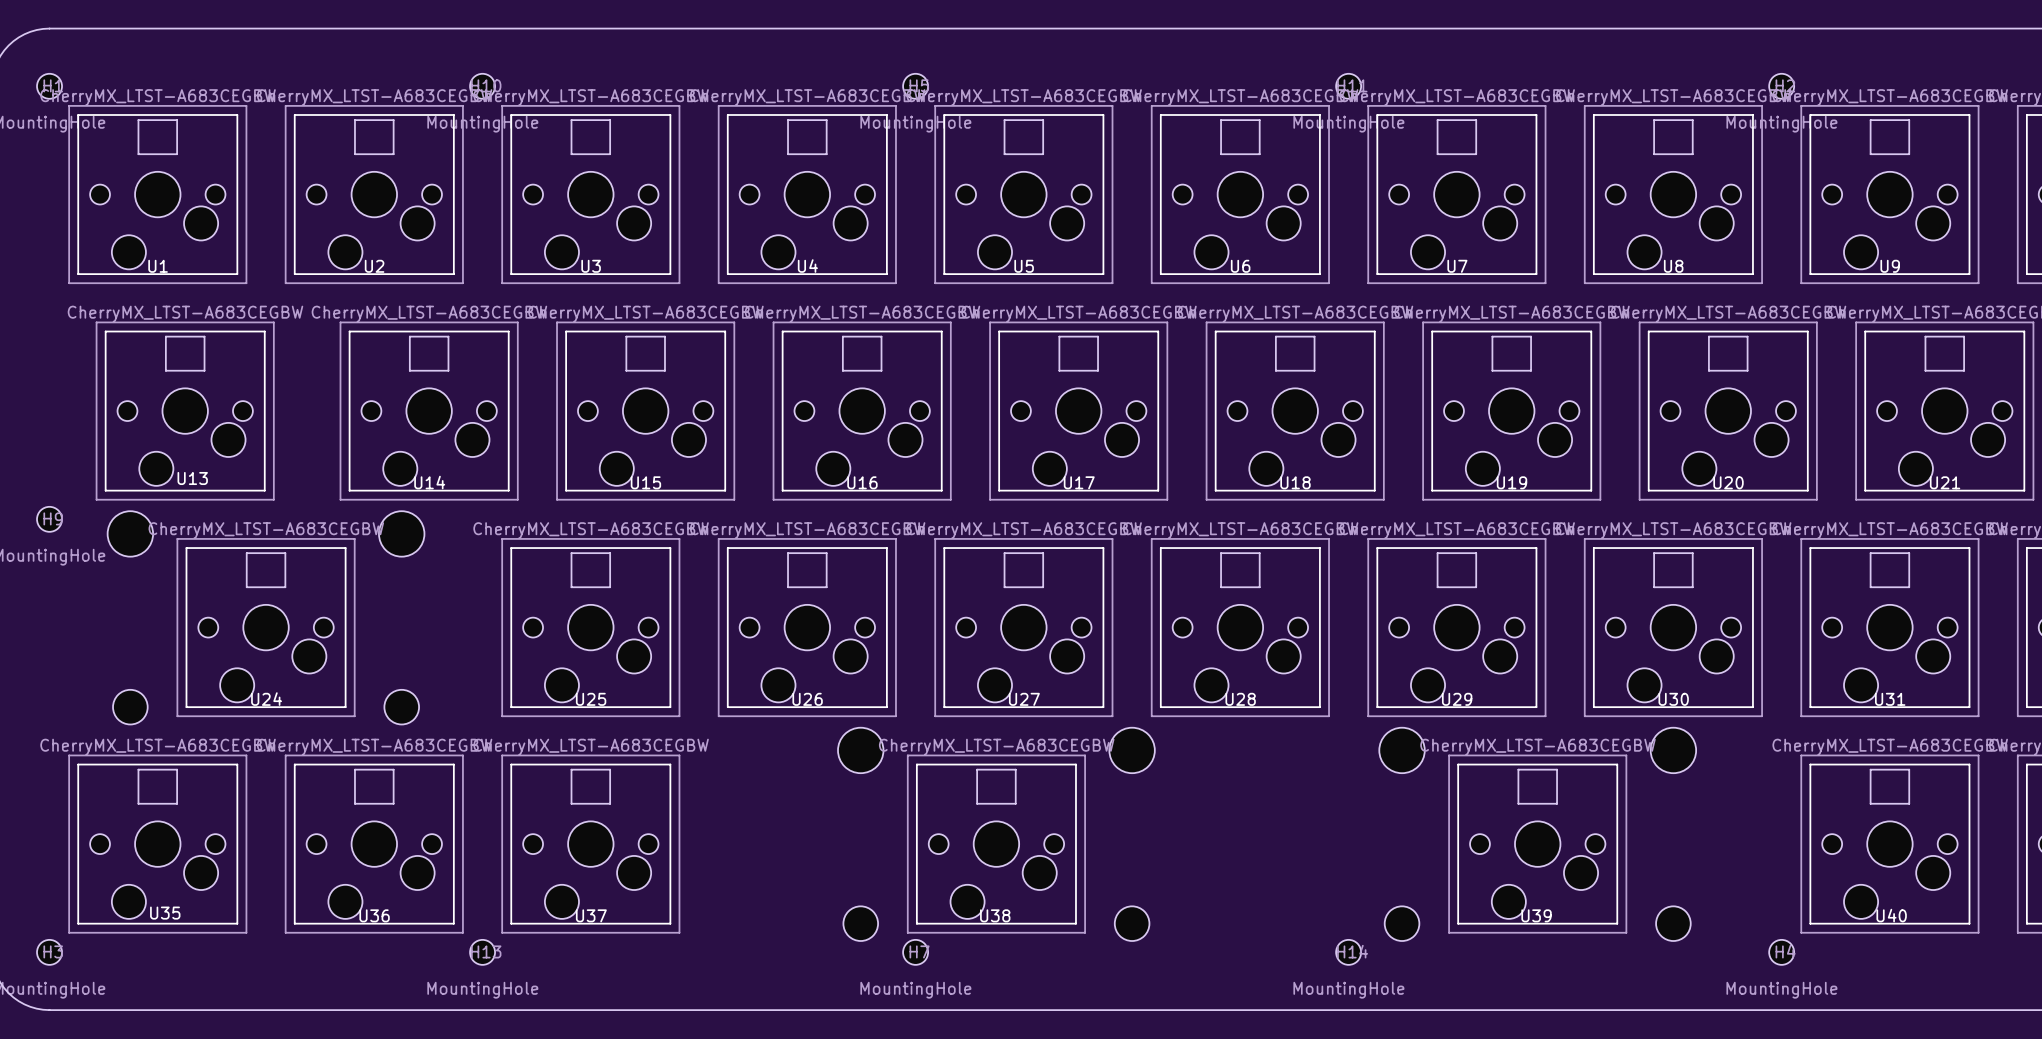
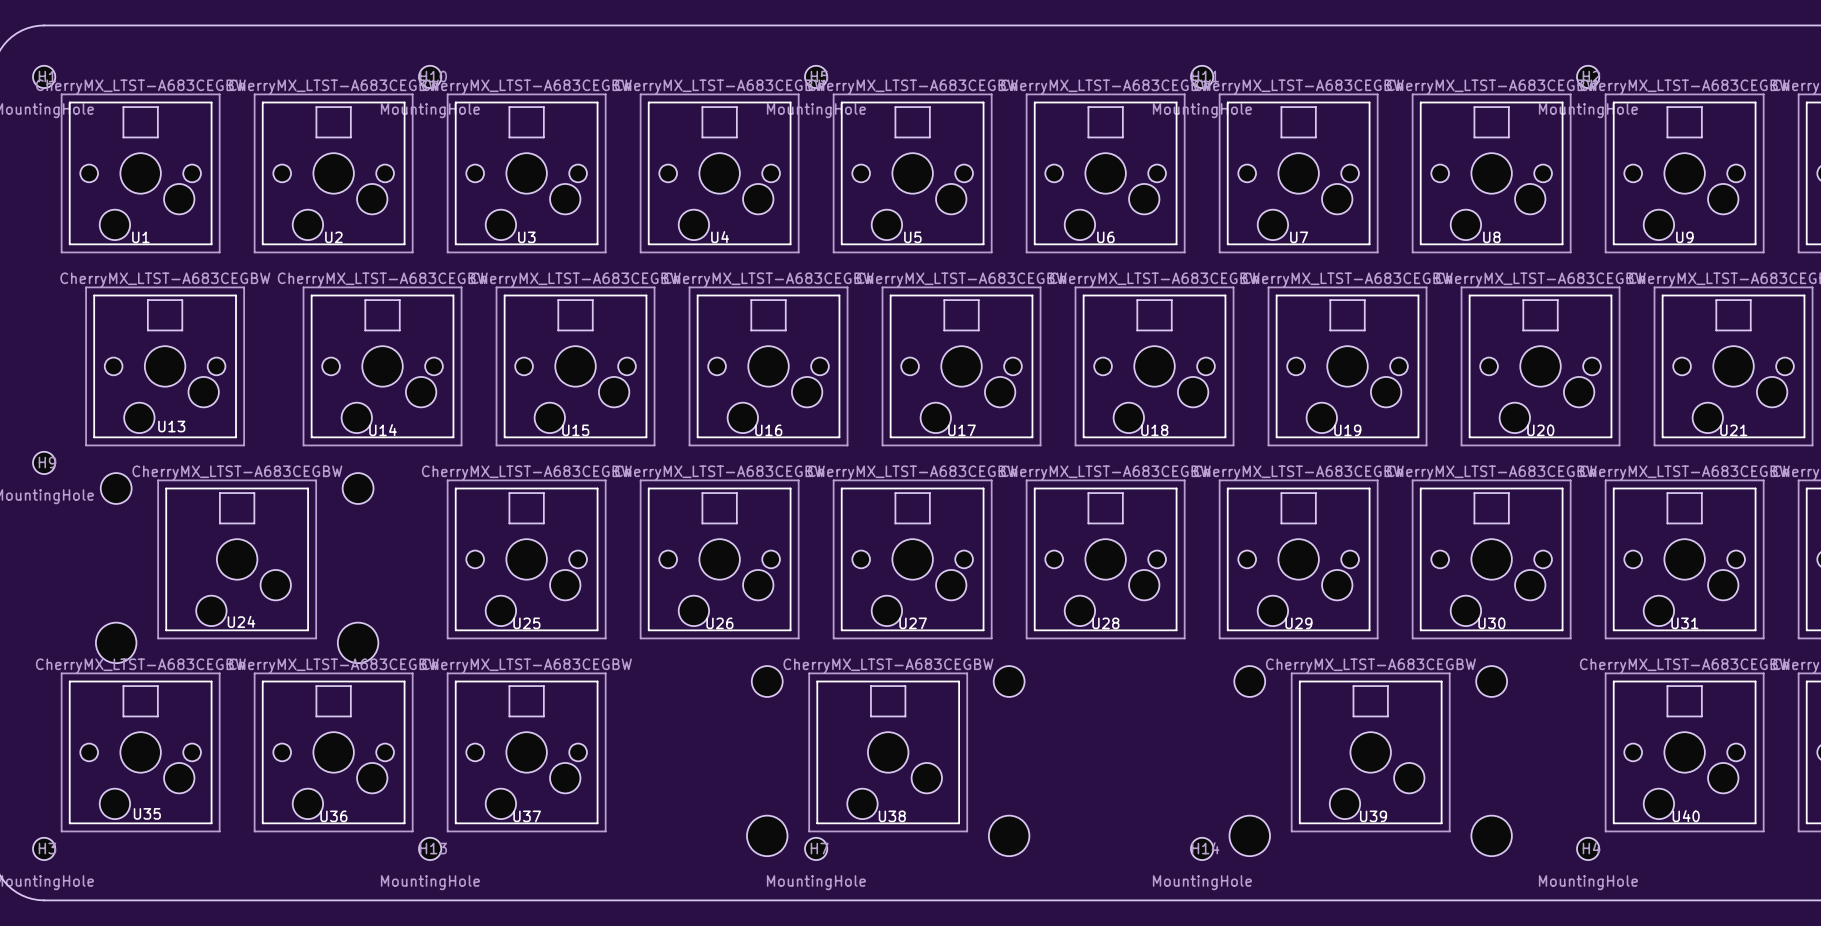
U24 footprint: [107, 511, 425, 725] -> [95, 473, 379, 664]
U38 footprint: [838, 727, 1155, 942] -> [746, 666, 1030, 857]
U39 footprint: [1379, 727, 1697, 942] -> [1229, 666, 1512, 857]

